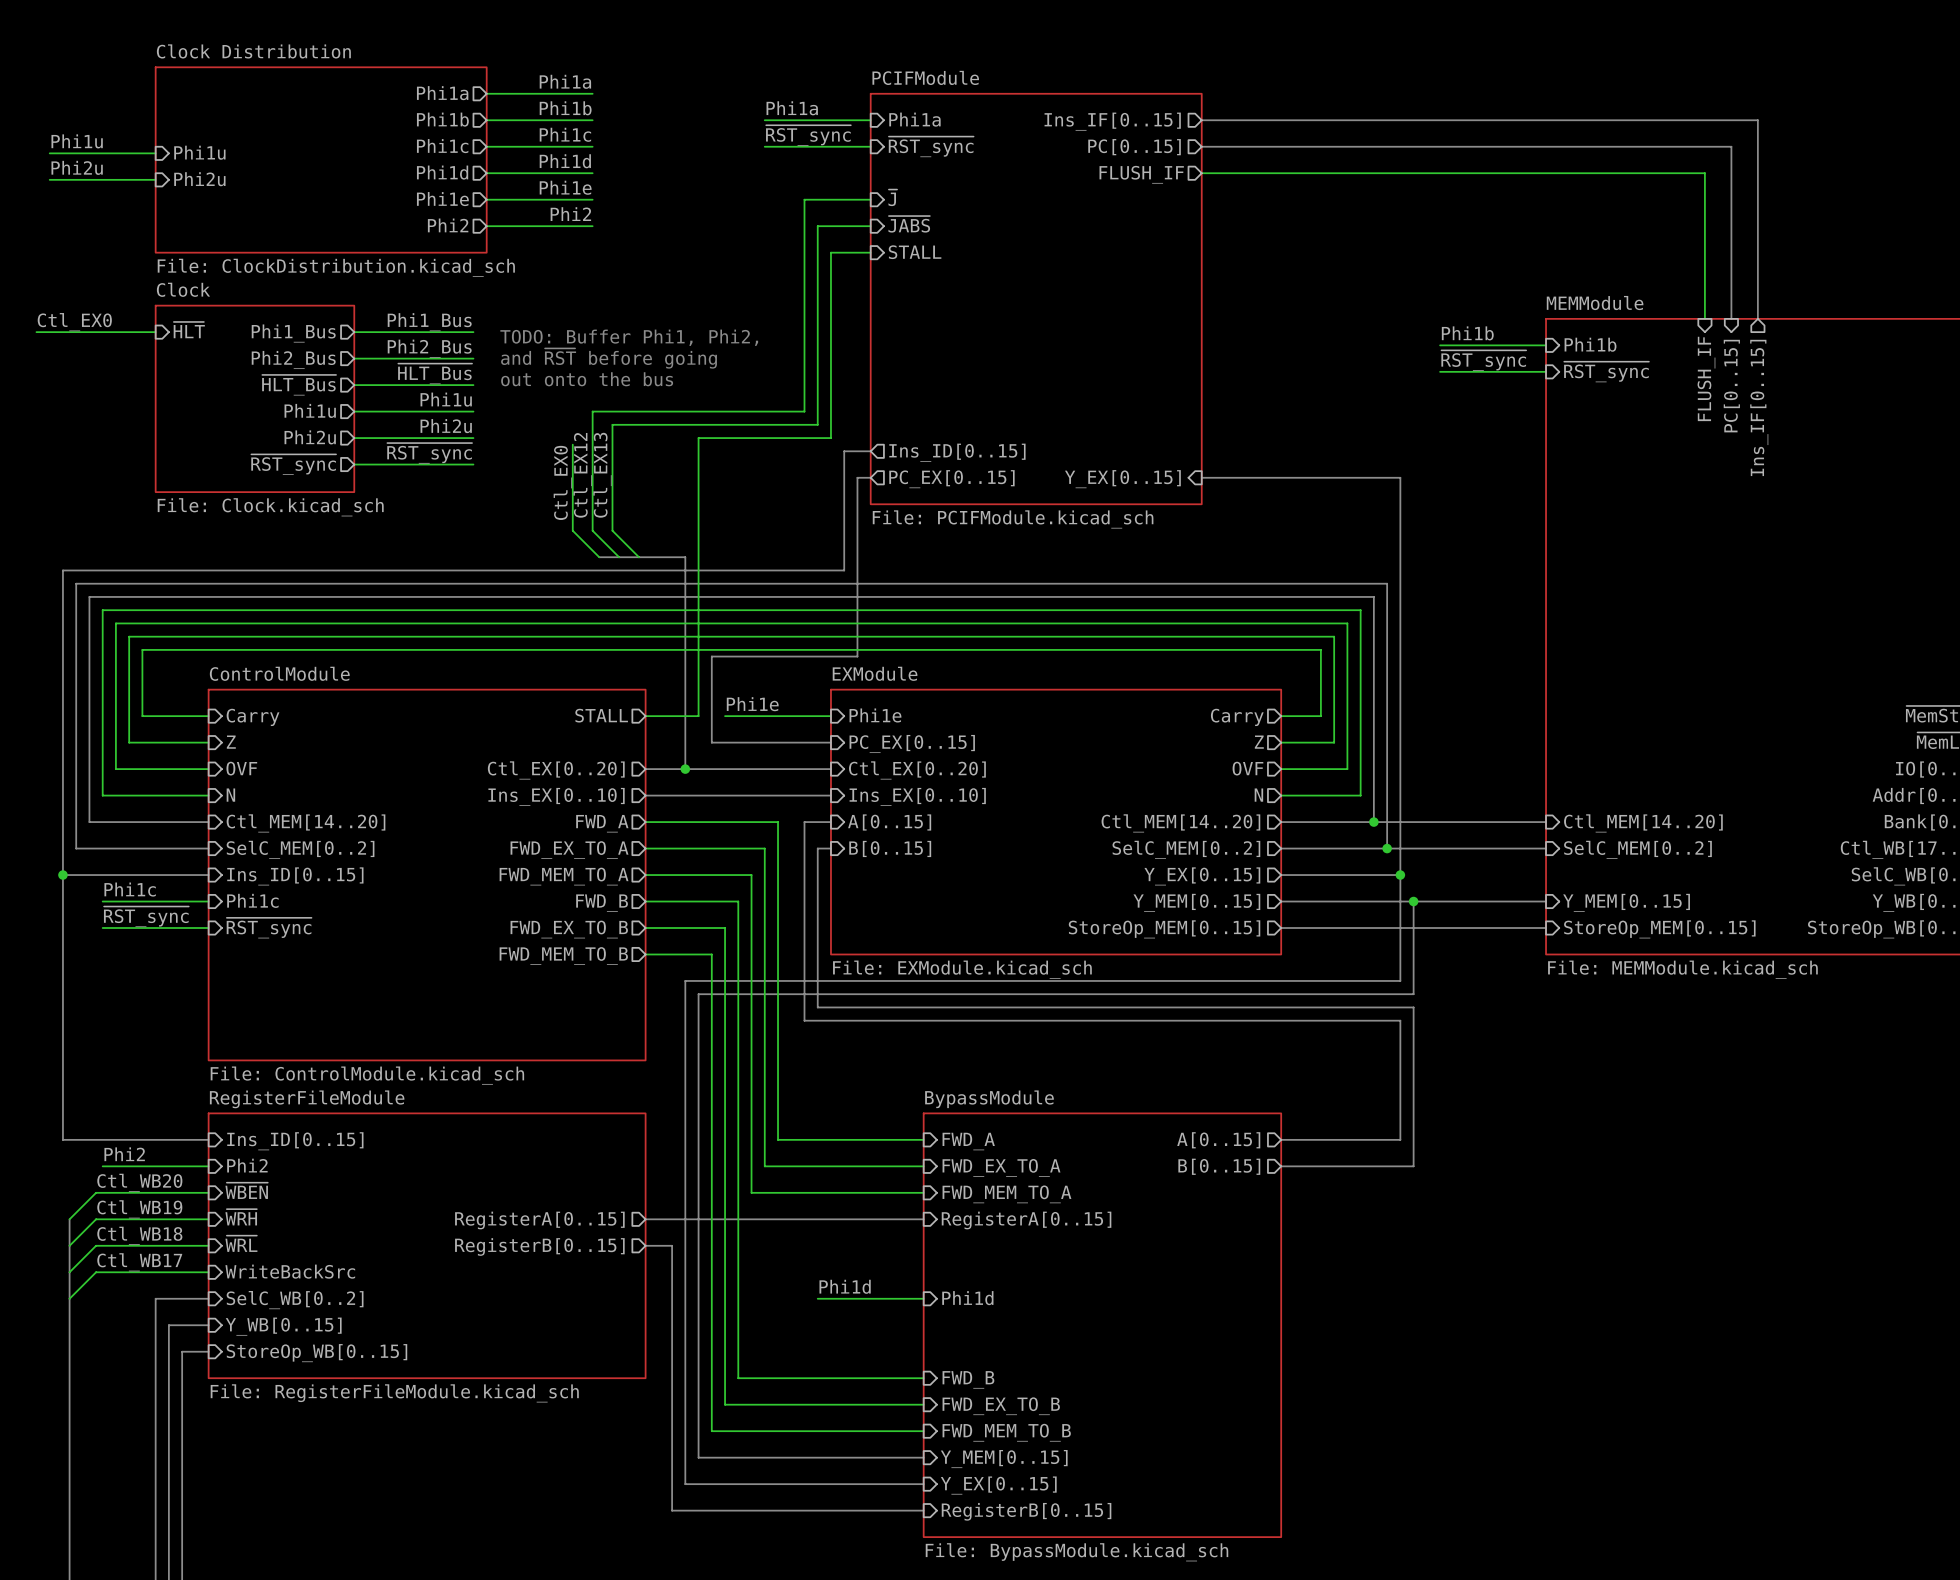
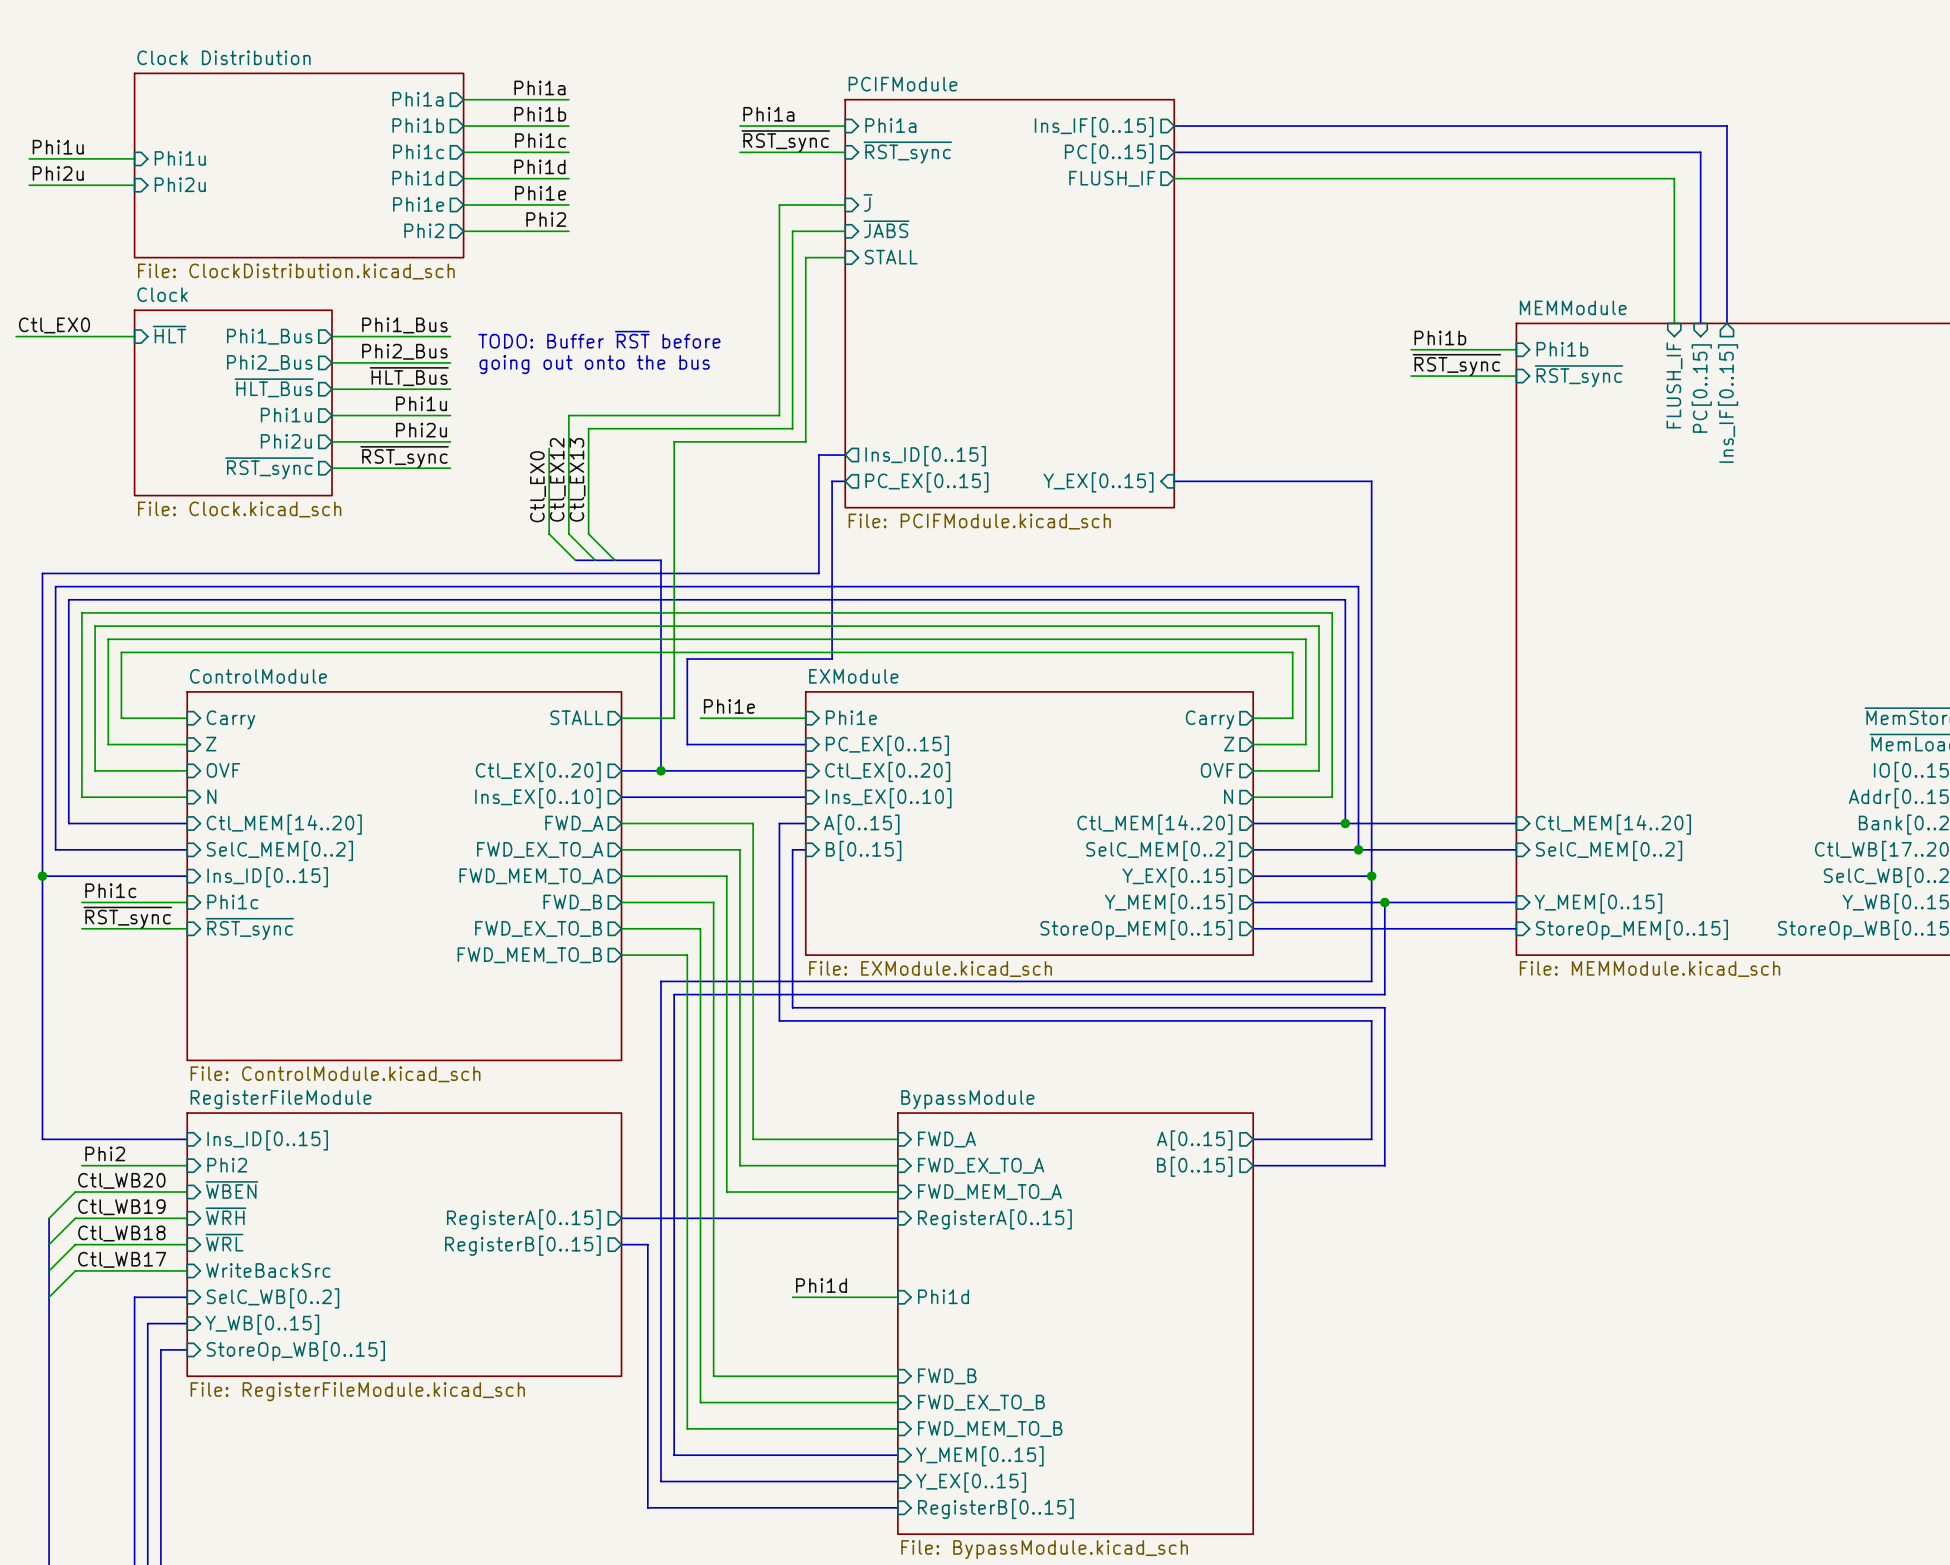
text: TODO: Buffer Phi1, Phi2, (629, 337) -> TODO: Buffer ~{RST} before (599, 339)
text: and ~{RST} before going (609, 358) -> going out onto the bus (594, 364)
text: out onto the bus (587, 379) -> none

